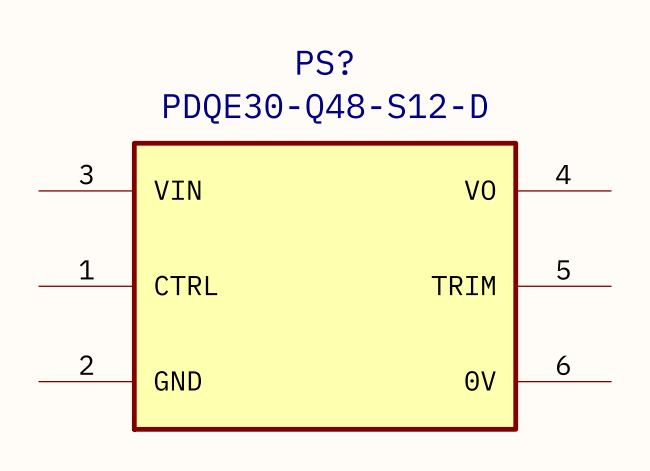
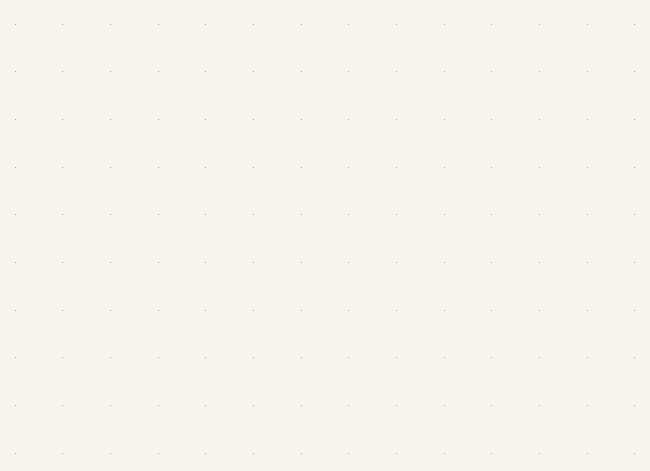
PS?: PDQE30-Q48-S12-D (325, 286) -> none

